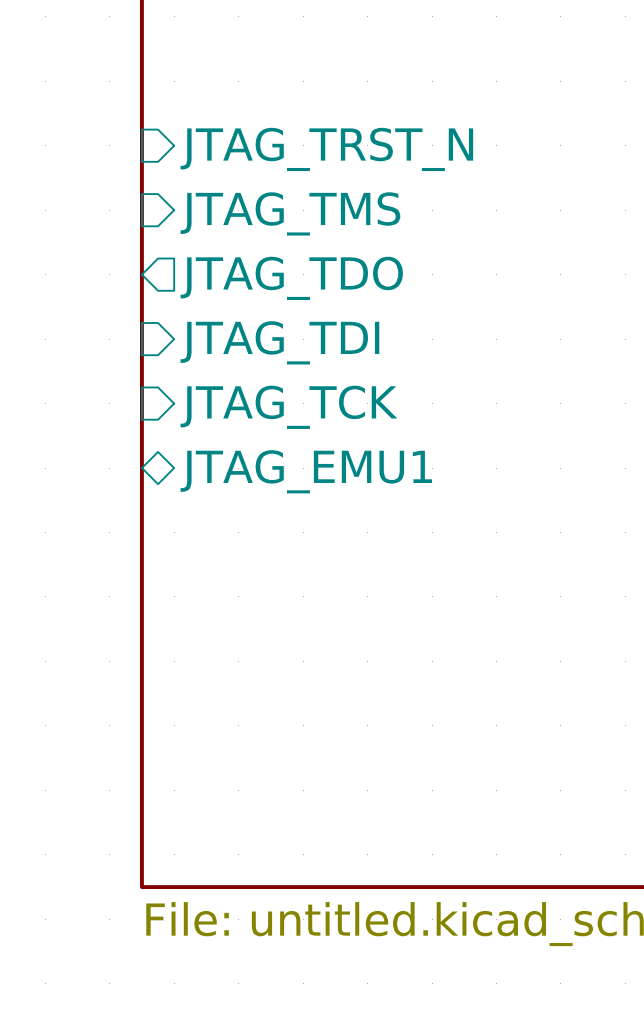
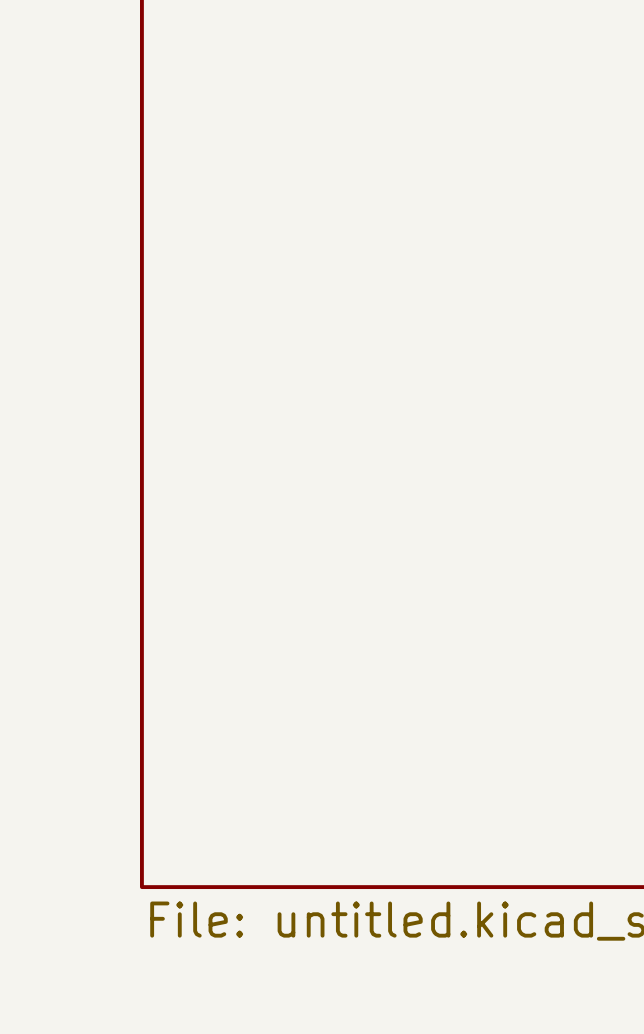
sheet pin: JTAG_TRST_N (326, 149) -> none
sheet pin: JTAG_TMS (290, 213) -> none
sheet pin: JTAG_TDO (291, 278) -> none
sheet pin: JTAG_TDI (279, 342) -> none
sheet pin: JTAG_TCK (288, 407) -> none
sheet pin: JTAG_EMU1 (306, 471) -> none

